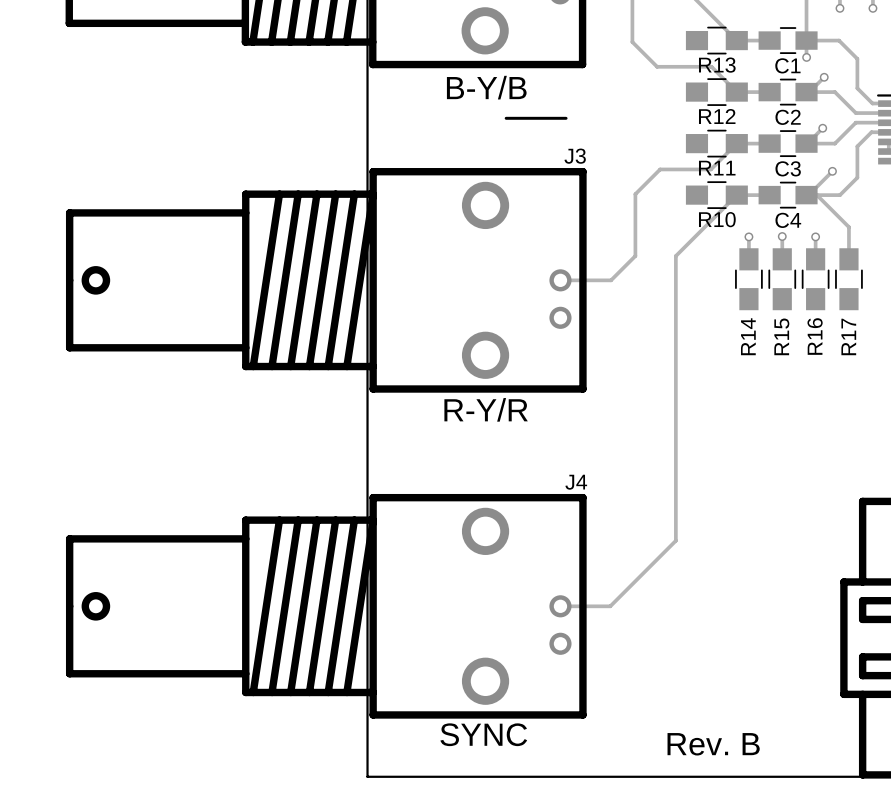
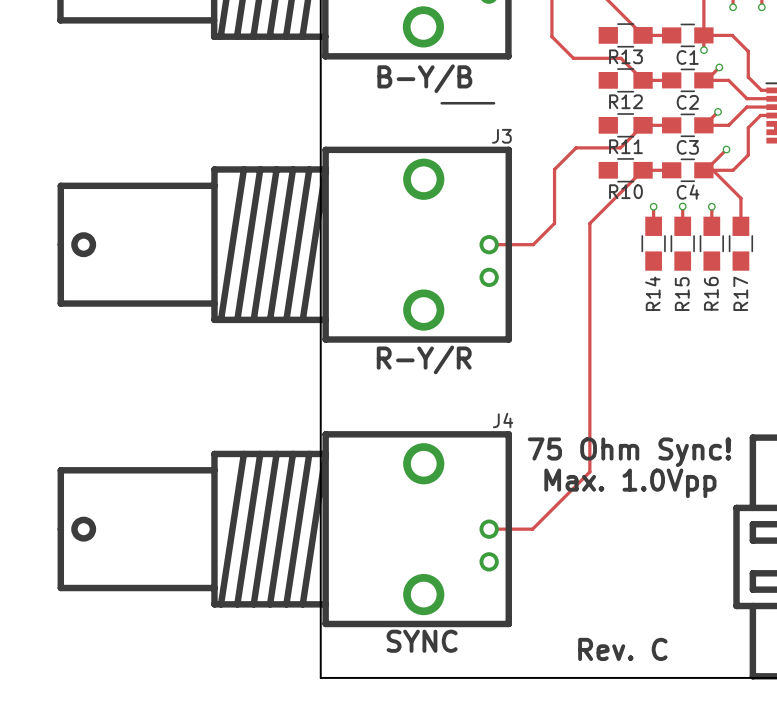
text: none -> 75 Ohm Sync! (629, 452)
text: none -> Max. 1.0Vpp (630, 483)
text: Rev. B (713, 744) -> Rev. C (622, 649)

